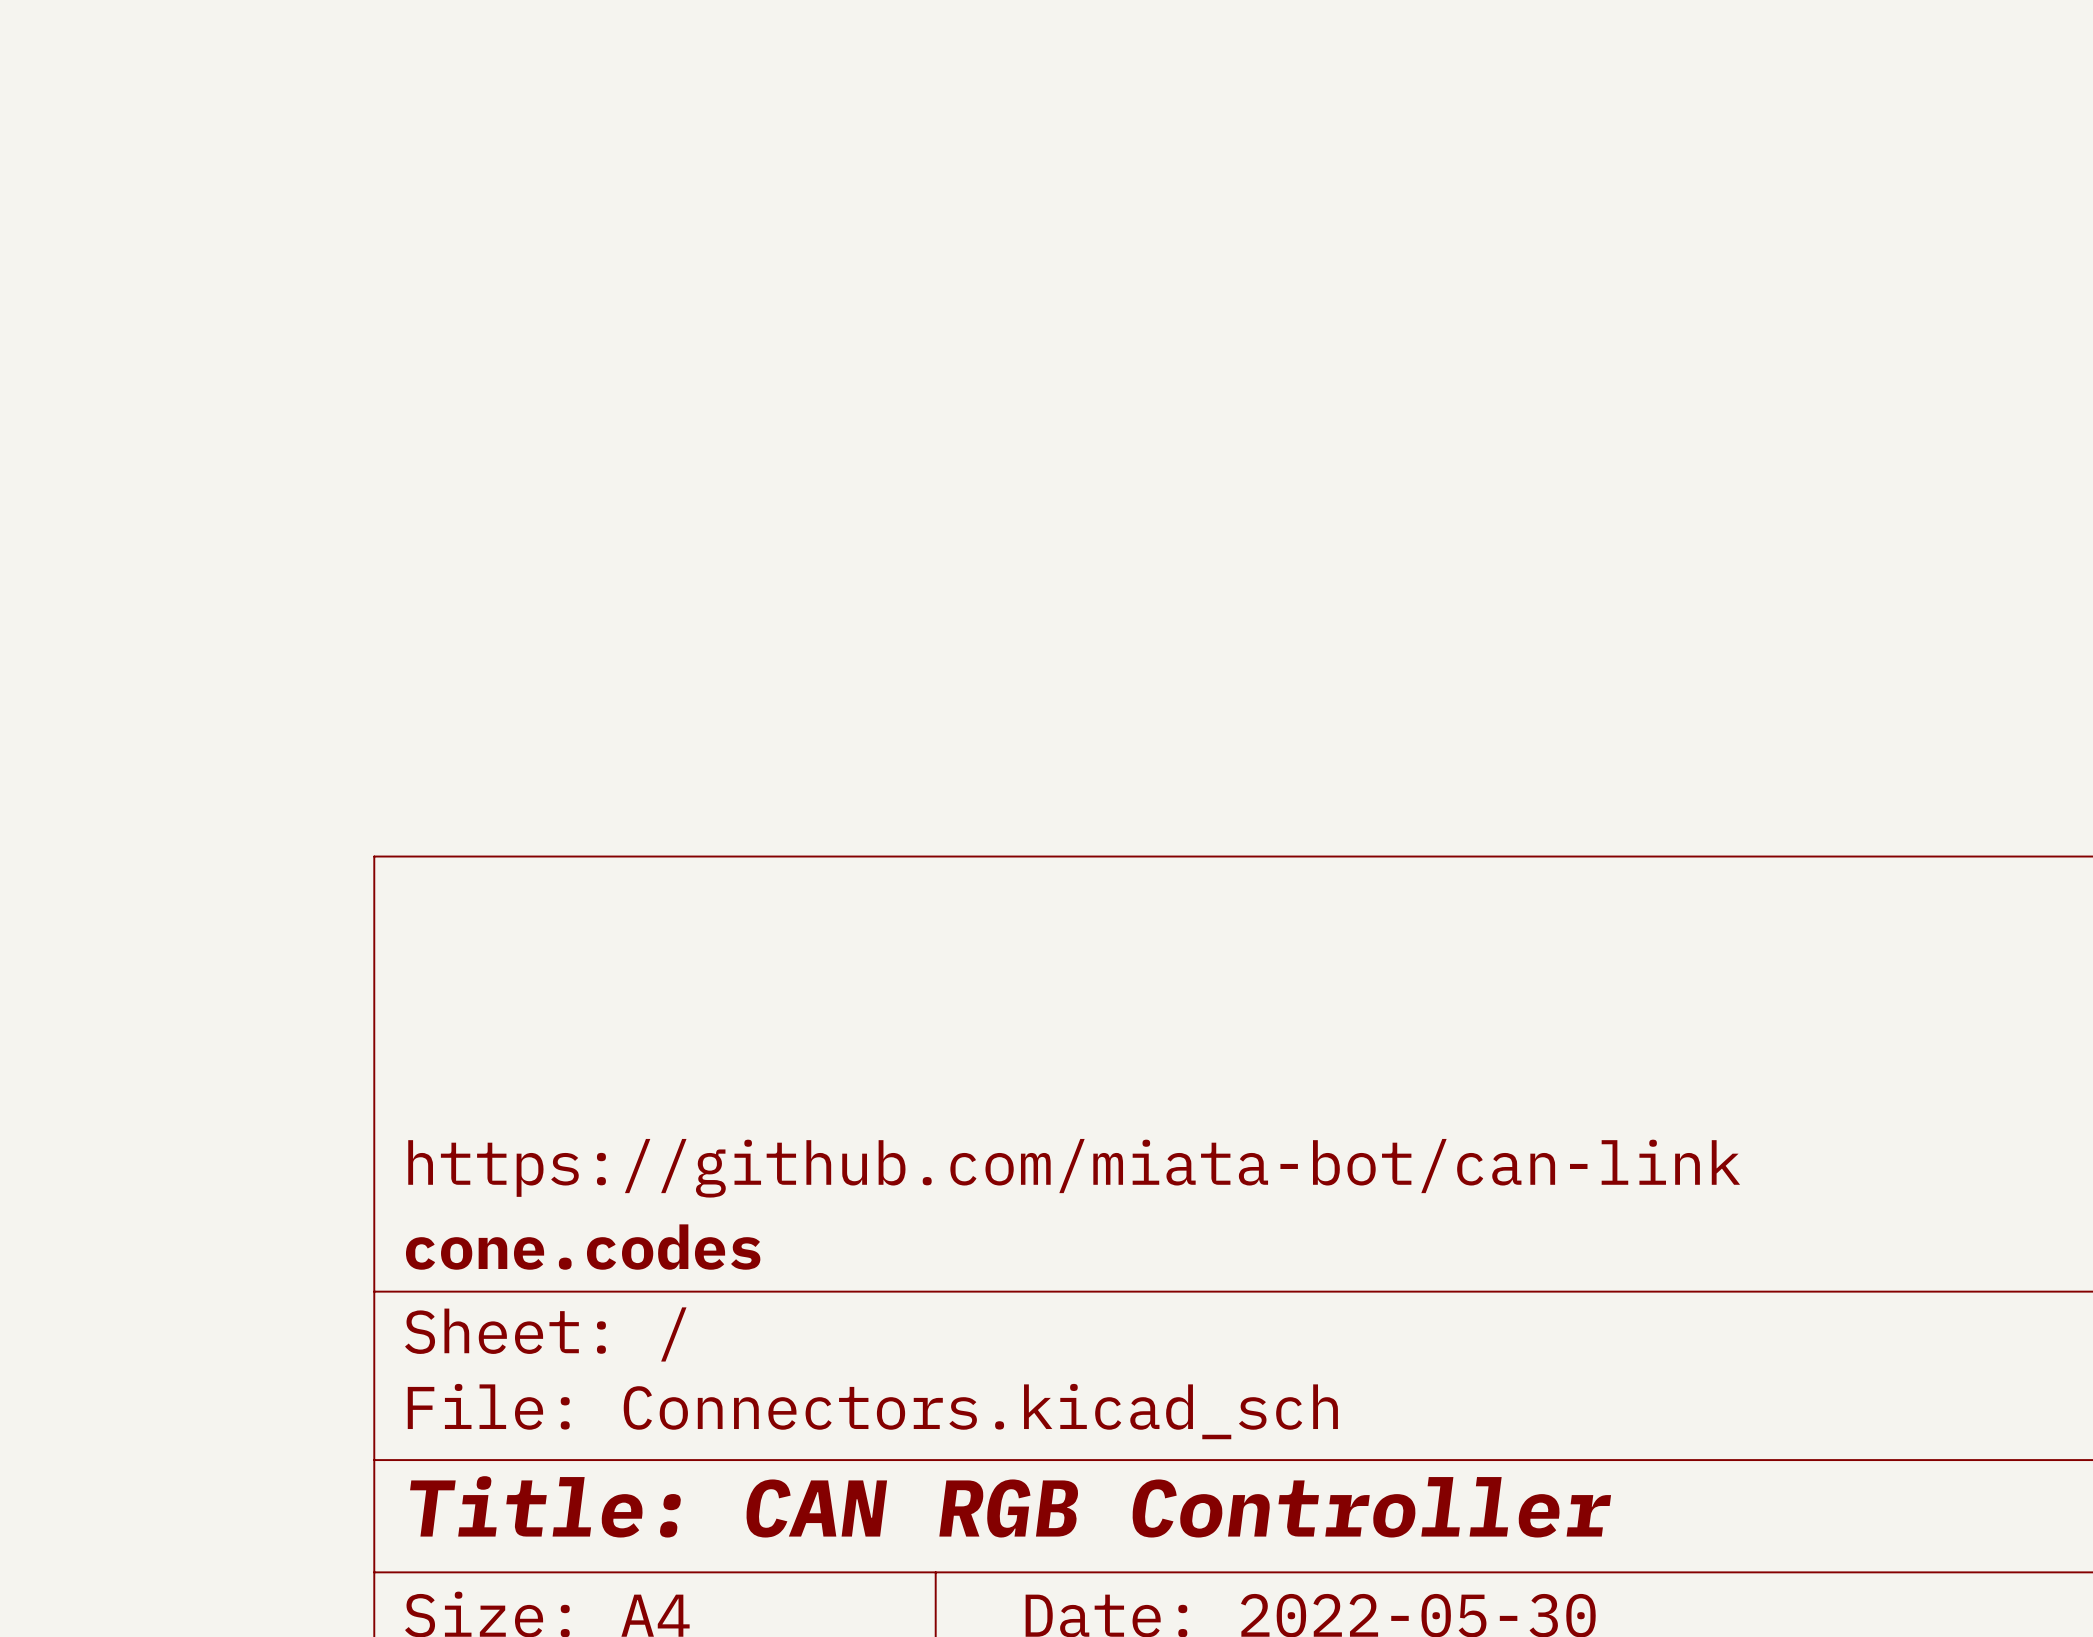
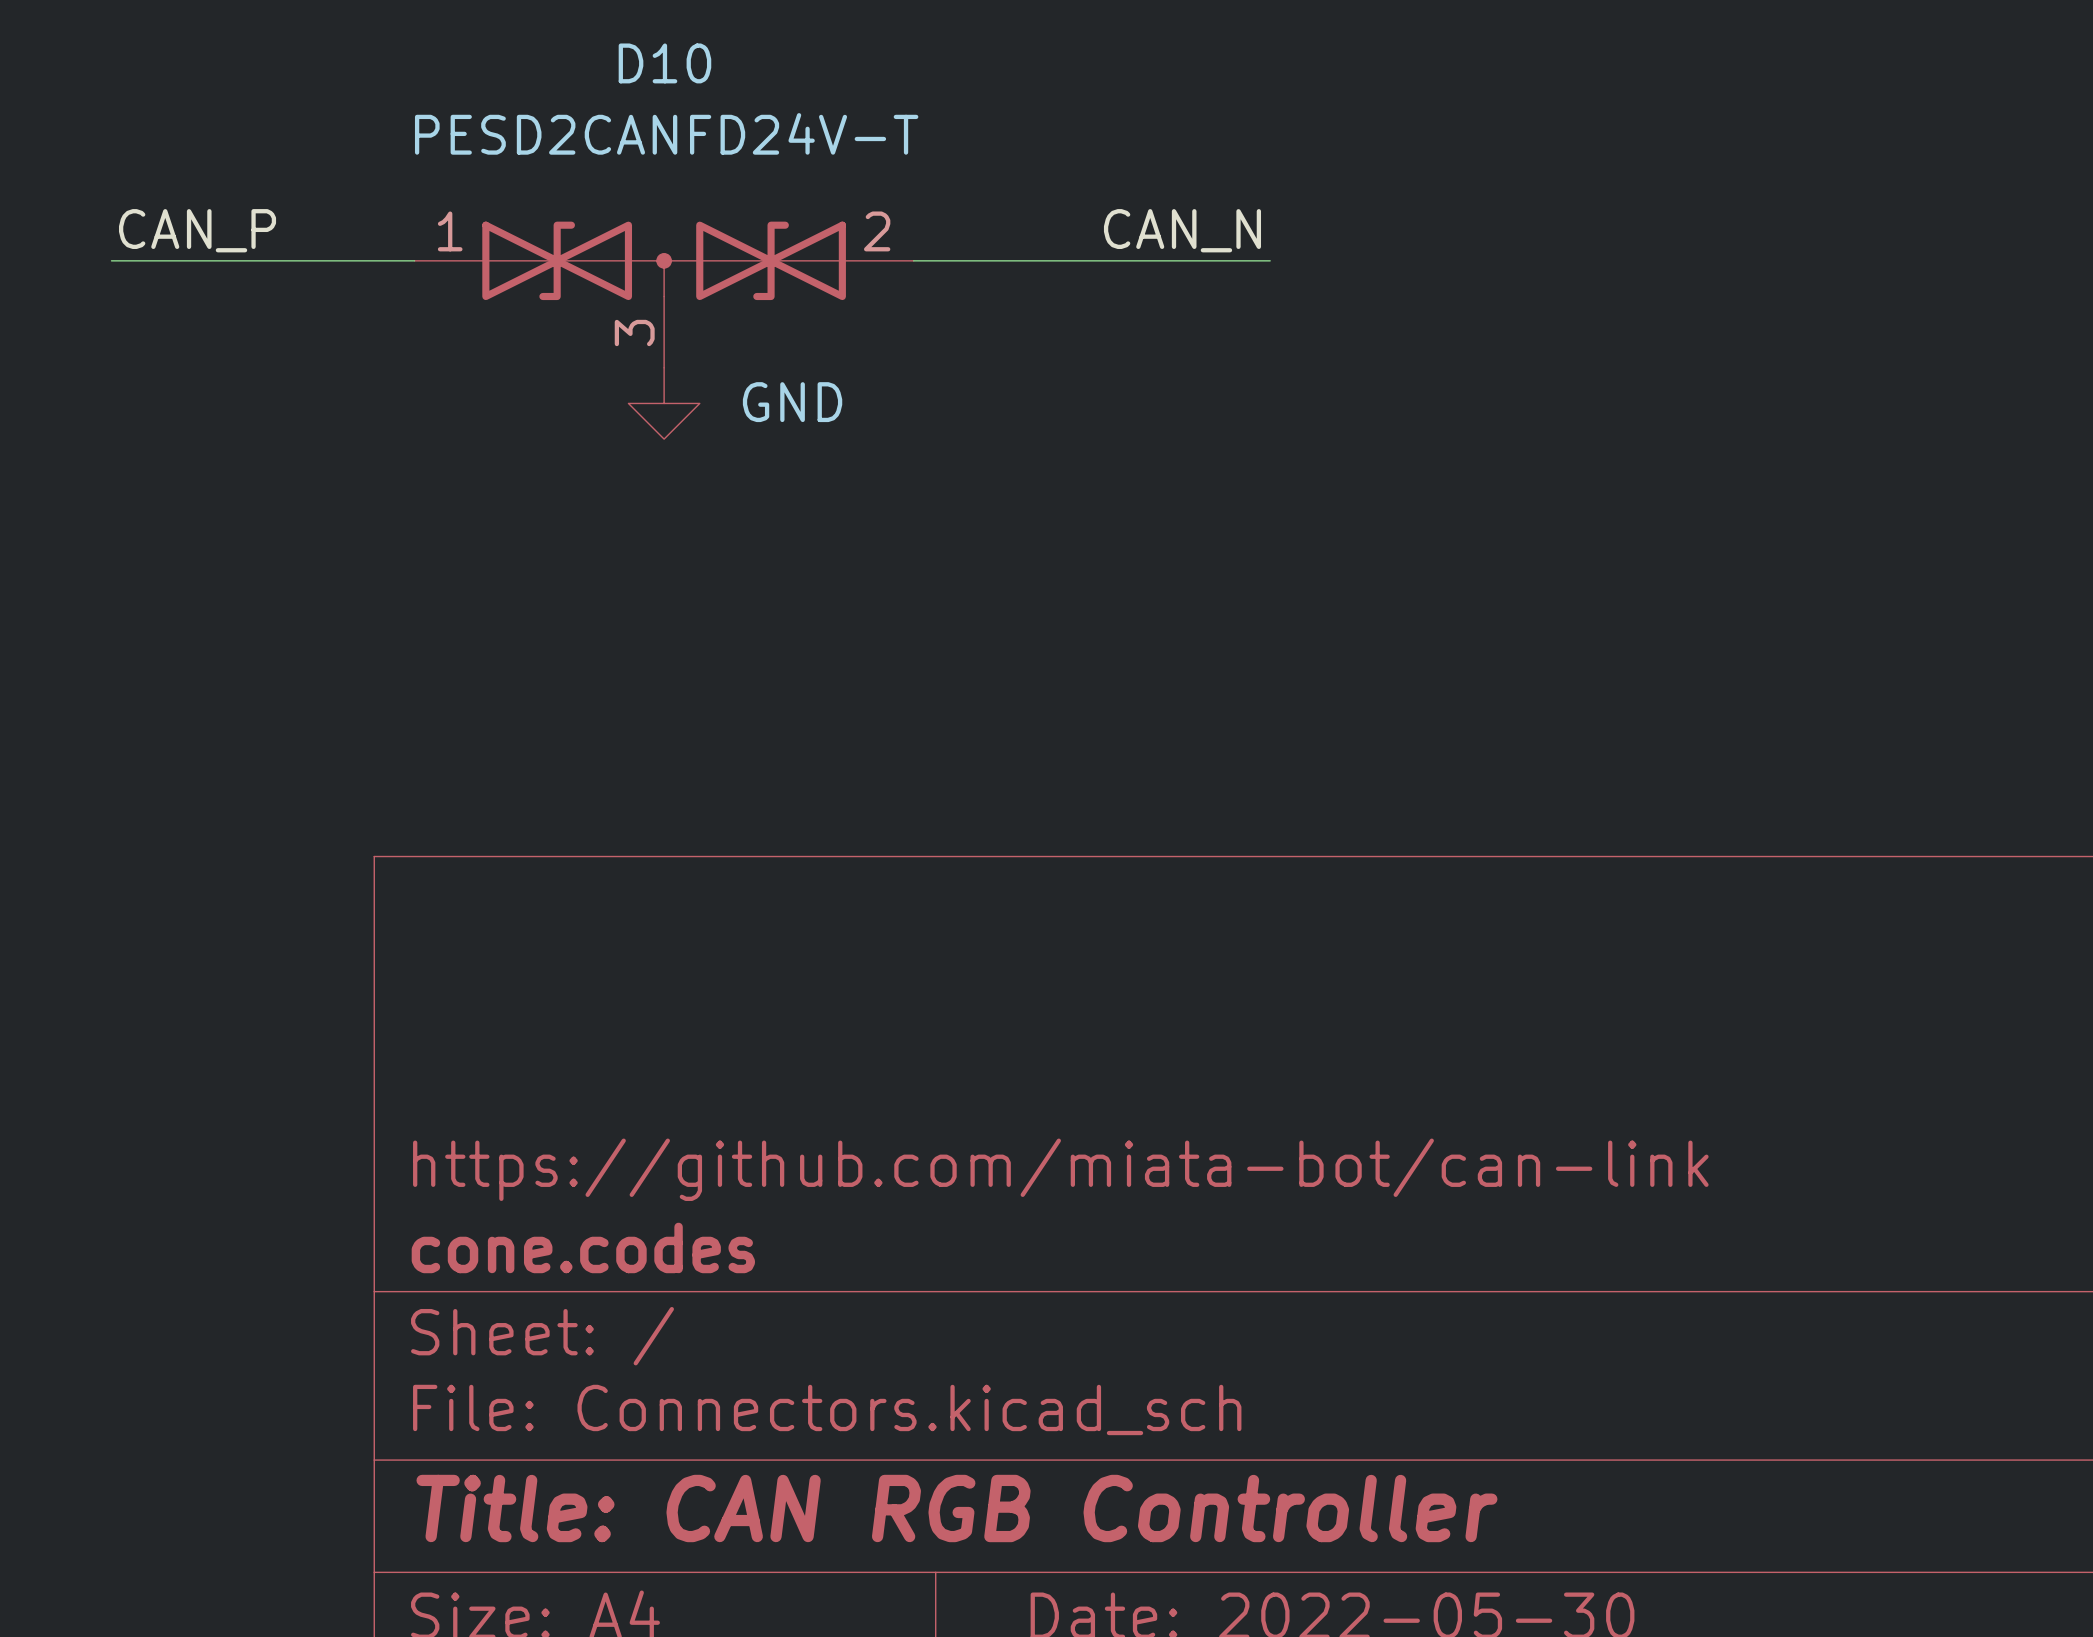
label: none -> CAN_P (197, 230)
label: none -> CAN_N (1182, 230)
wire: none -> (111, 260) (414, 260)
wire: none -> (913, 260) (1270, 260)
D10: none -> PESD2CANFD24V-T (664, 294)
power symbol: none -> GND (664, 403)

